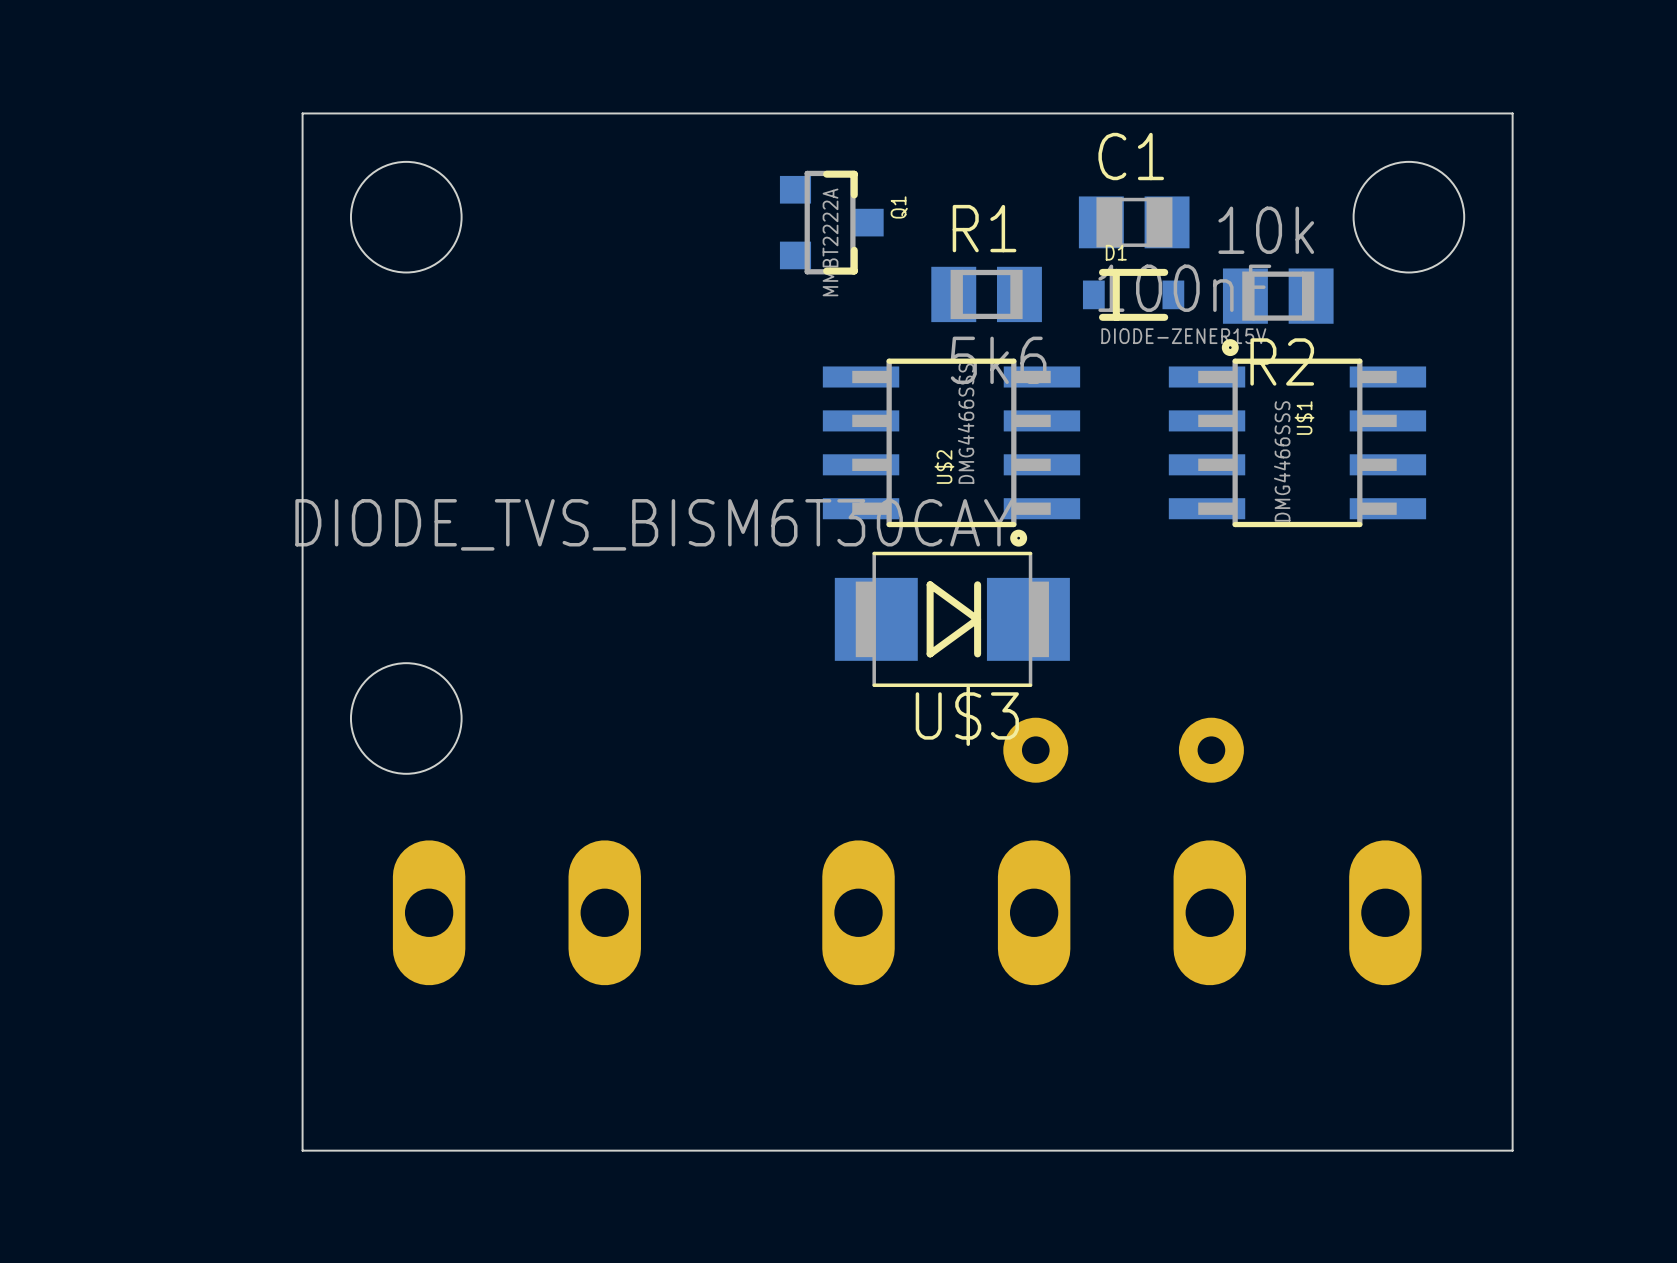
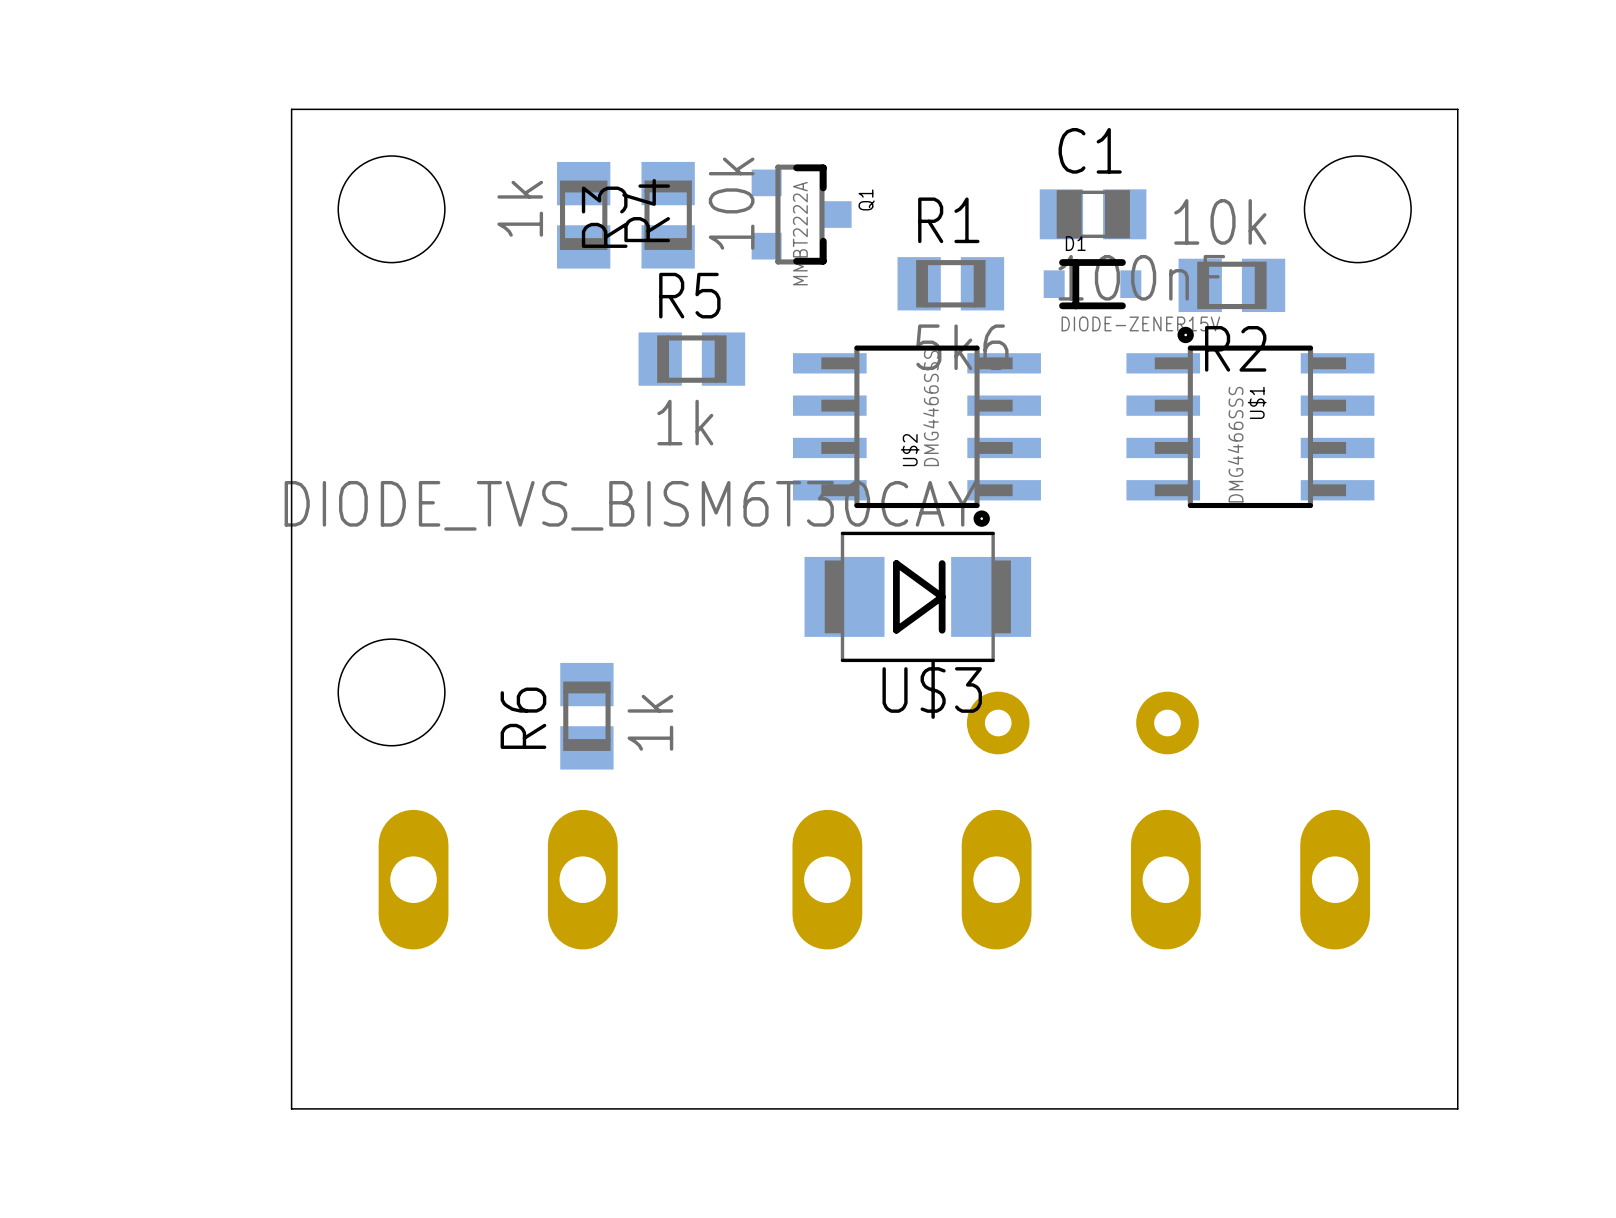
R4: none -> 1k (583, 215)
R3: none -> 10k (668, 215)
R5: none -> 1k (691, 359)
R6: none -> 1k (586, 716)

